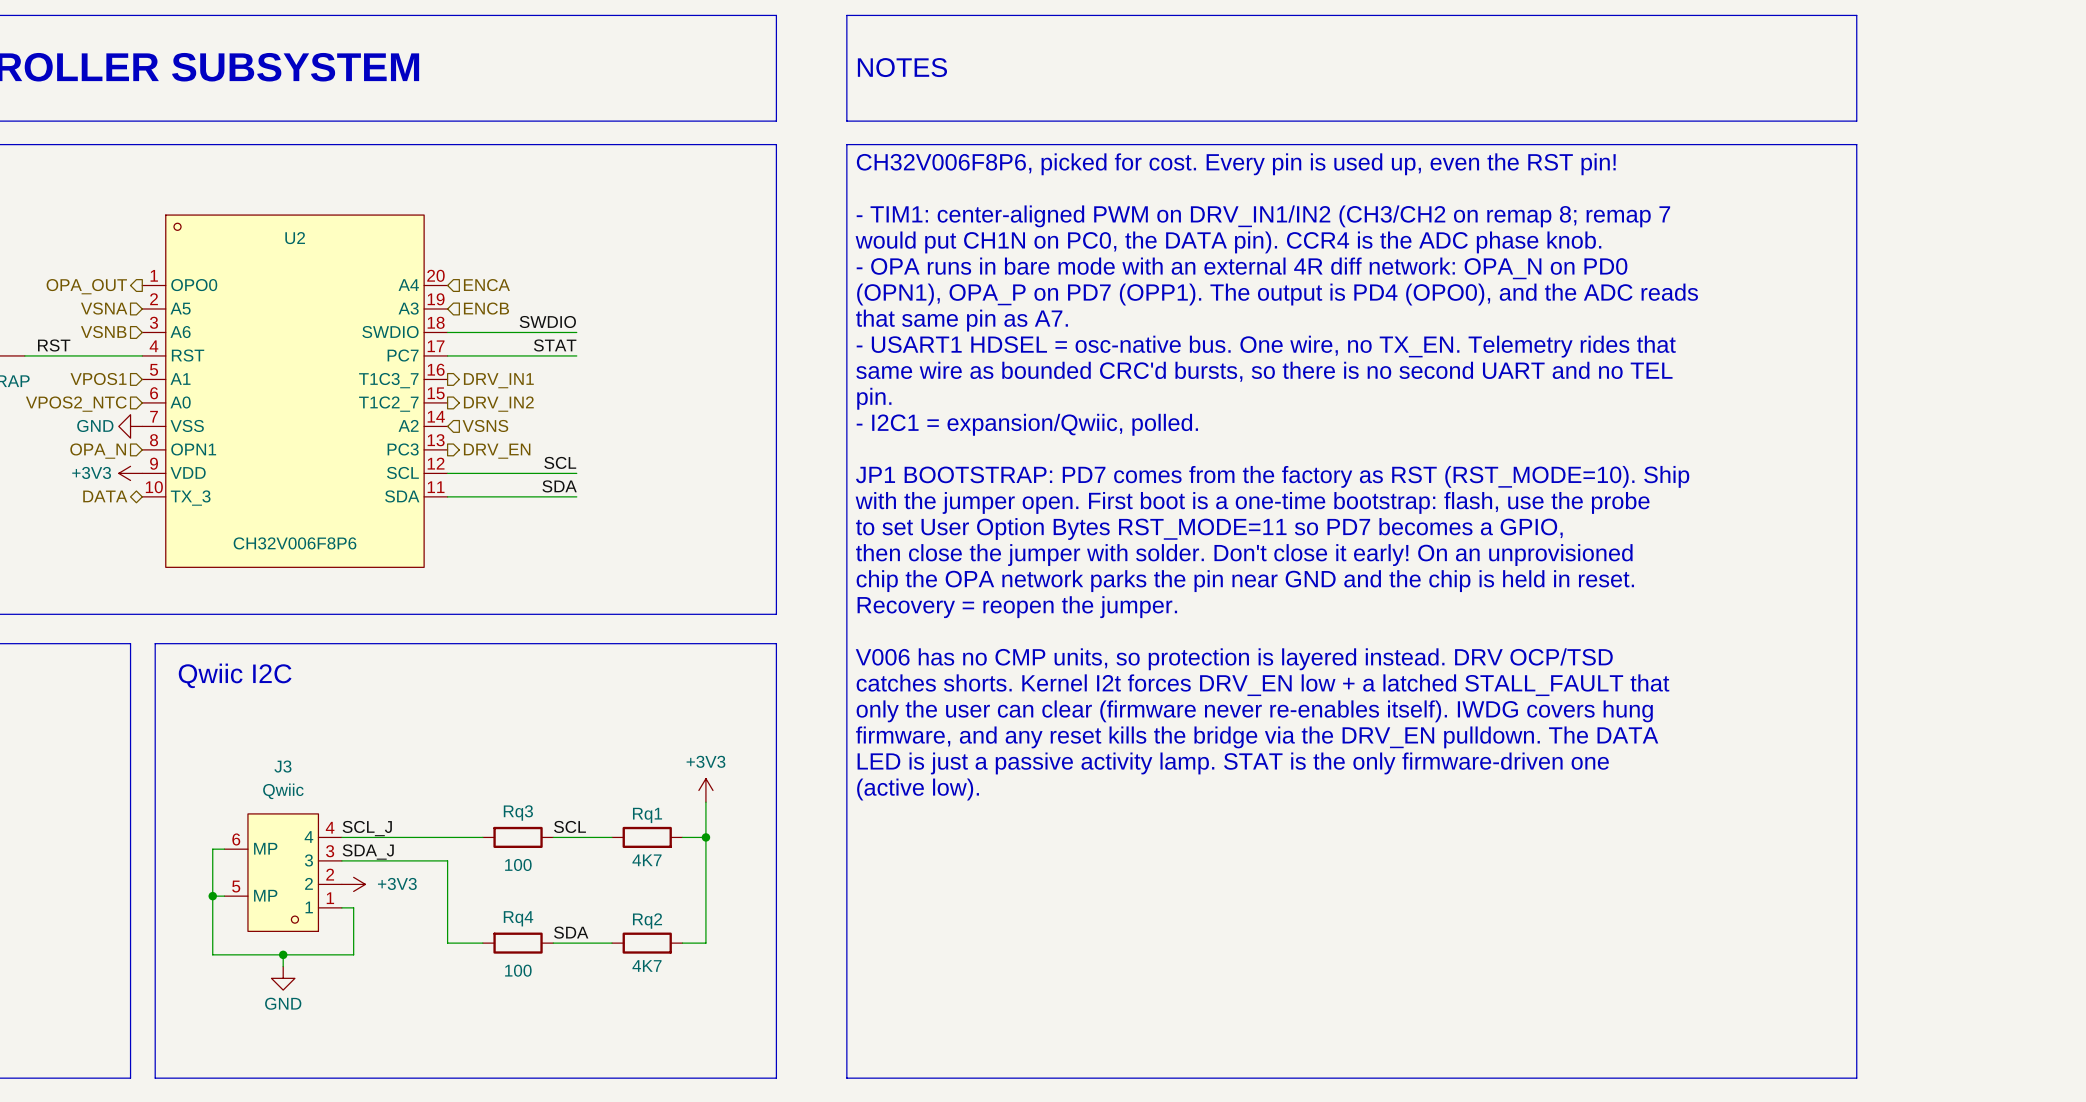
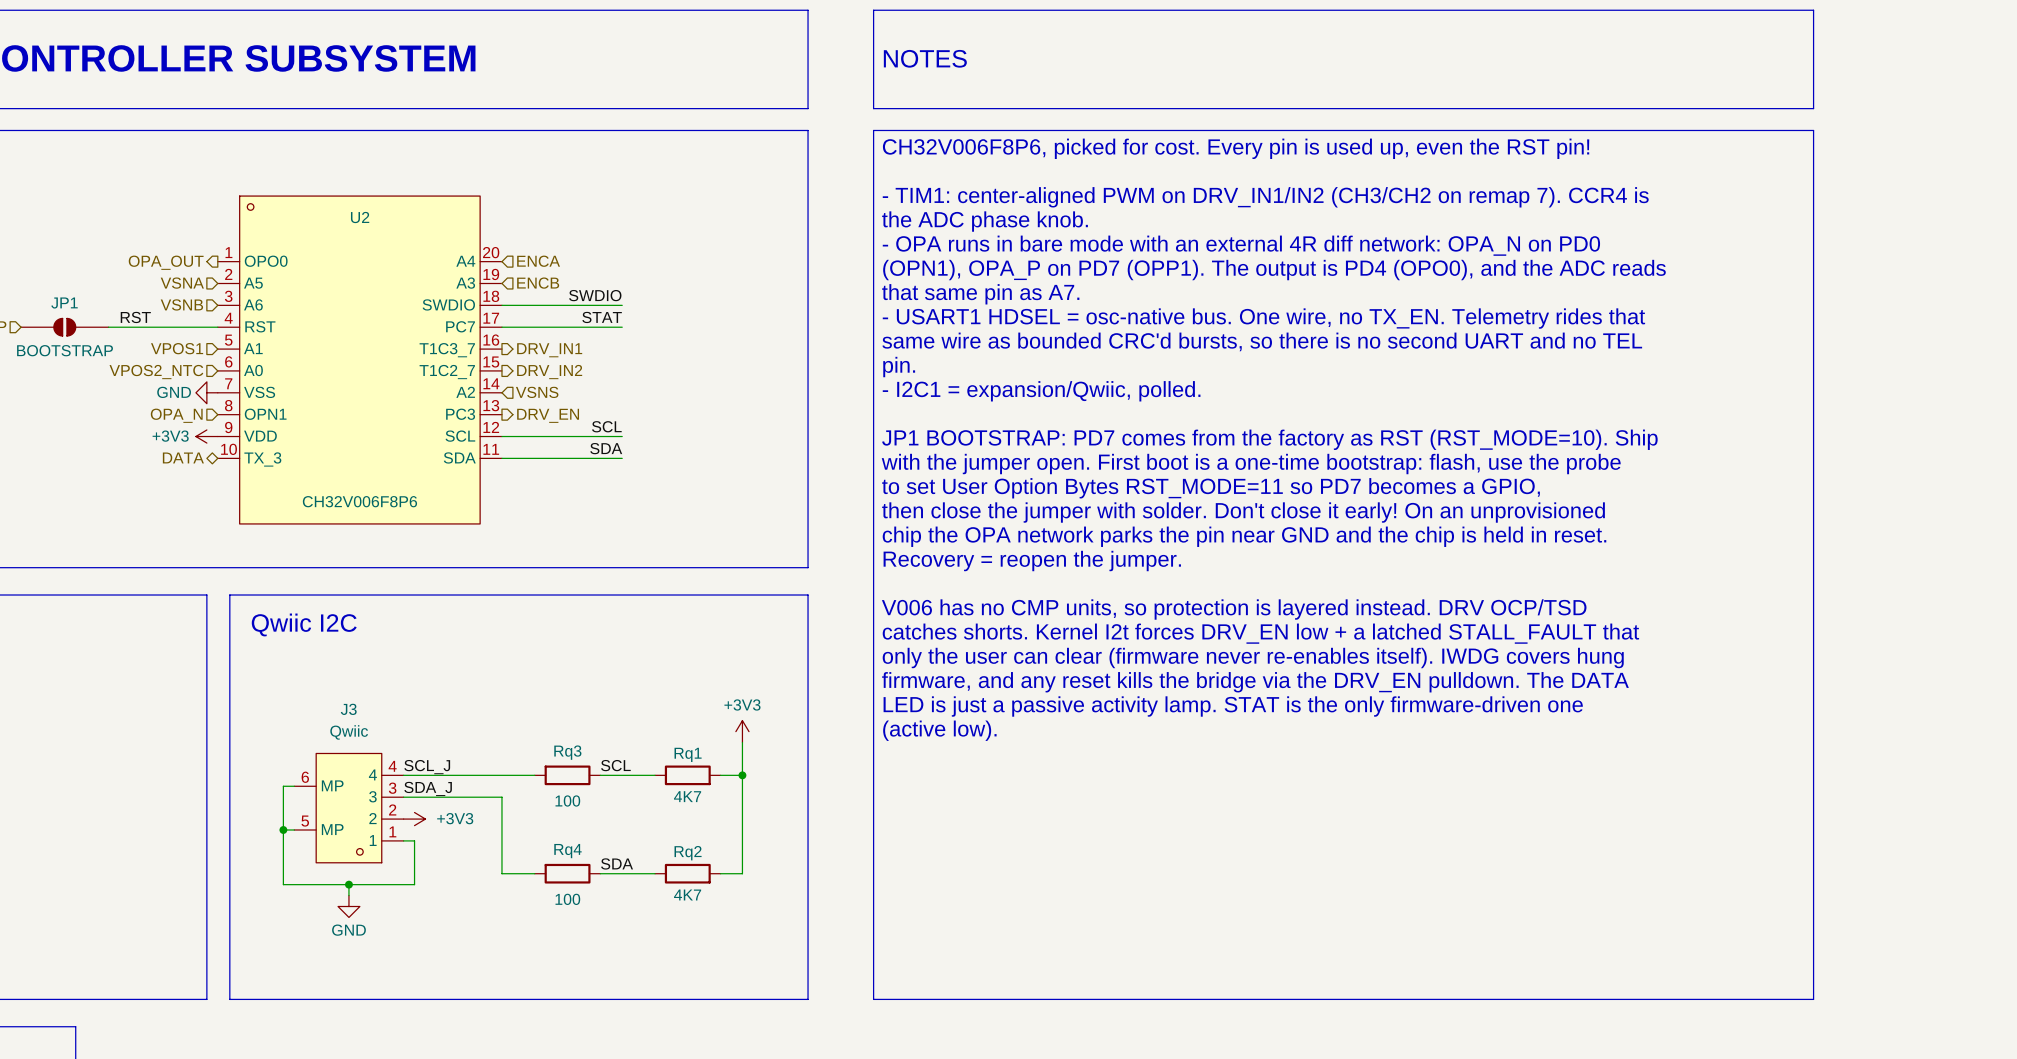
text: - TIM1: center-aligned PWM on DRV_IN1/IN2 (CH3/CH2 on remap 8; remap 7 (1263, 216) -> - TIM1: center-aligned PWM on DRV_IN1/IN2 (CH3/CH2 on remap 7). CCR4 is (1265, 197)
text: would put CH1N on PC0, the DATA pin). CCR4 is the ADC phase knob. (1228, 242) -> the ADC phase knob. (985, 221)

